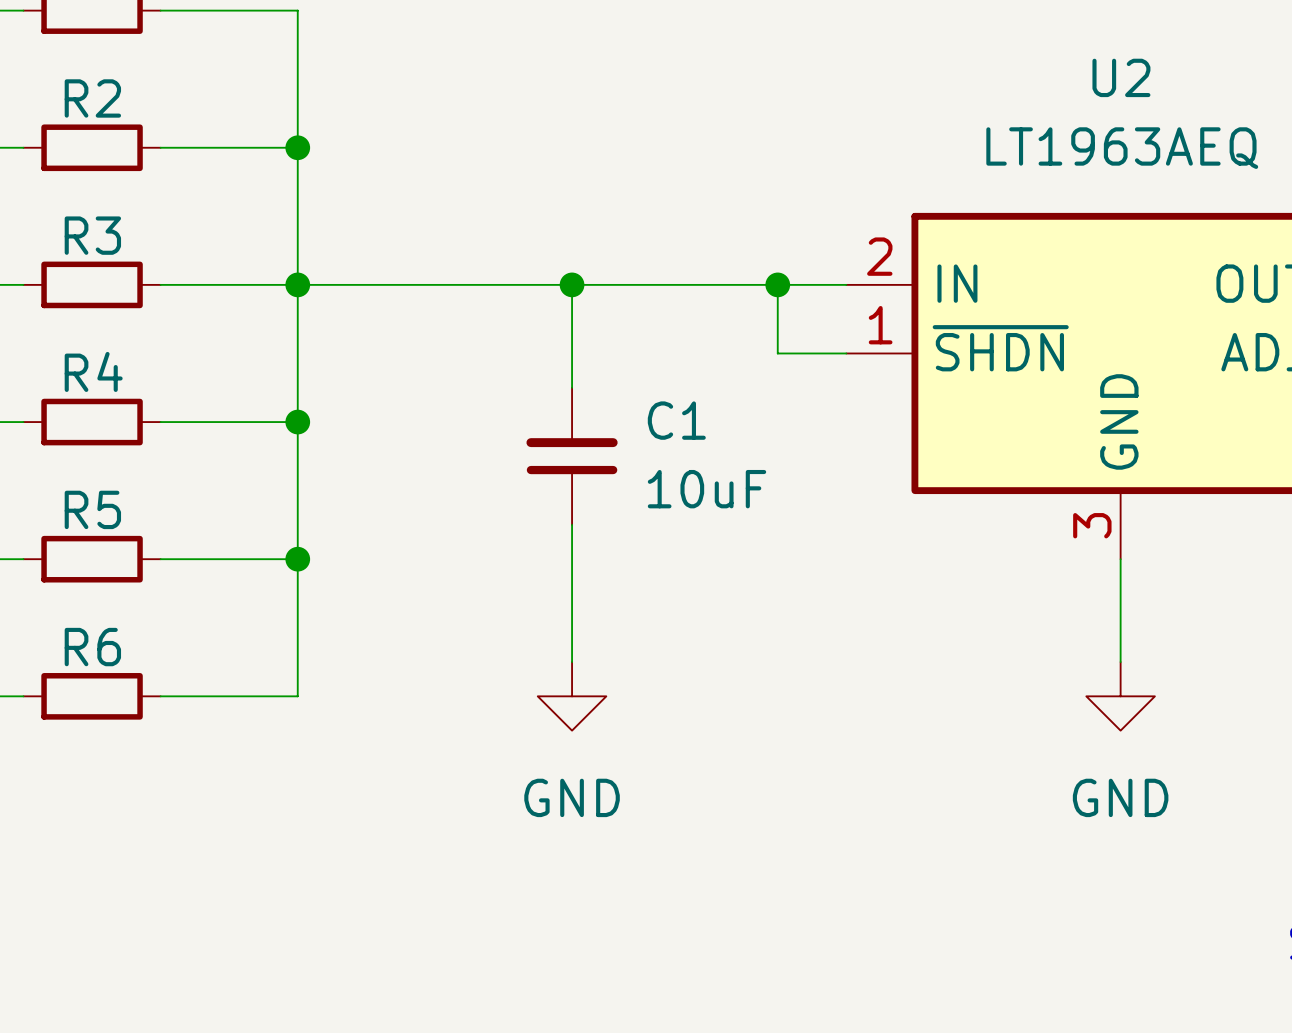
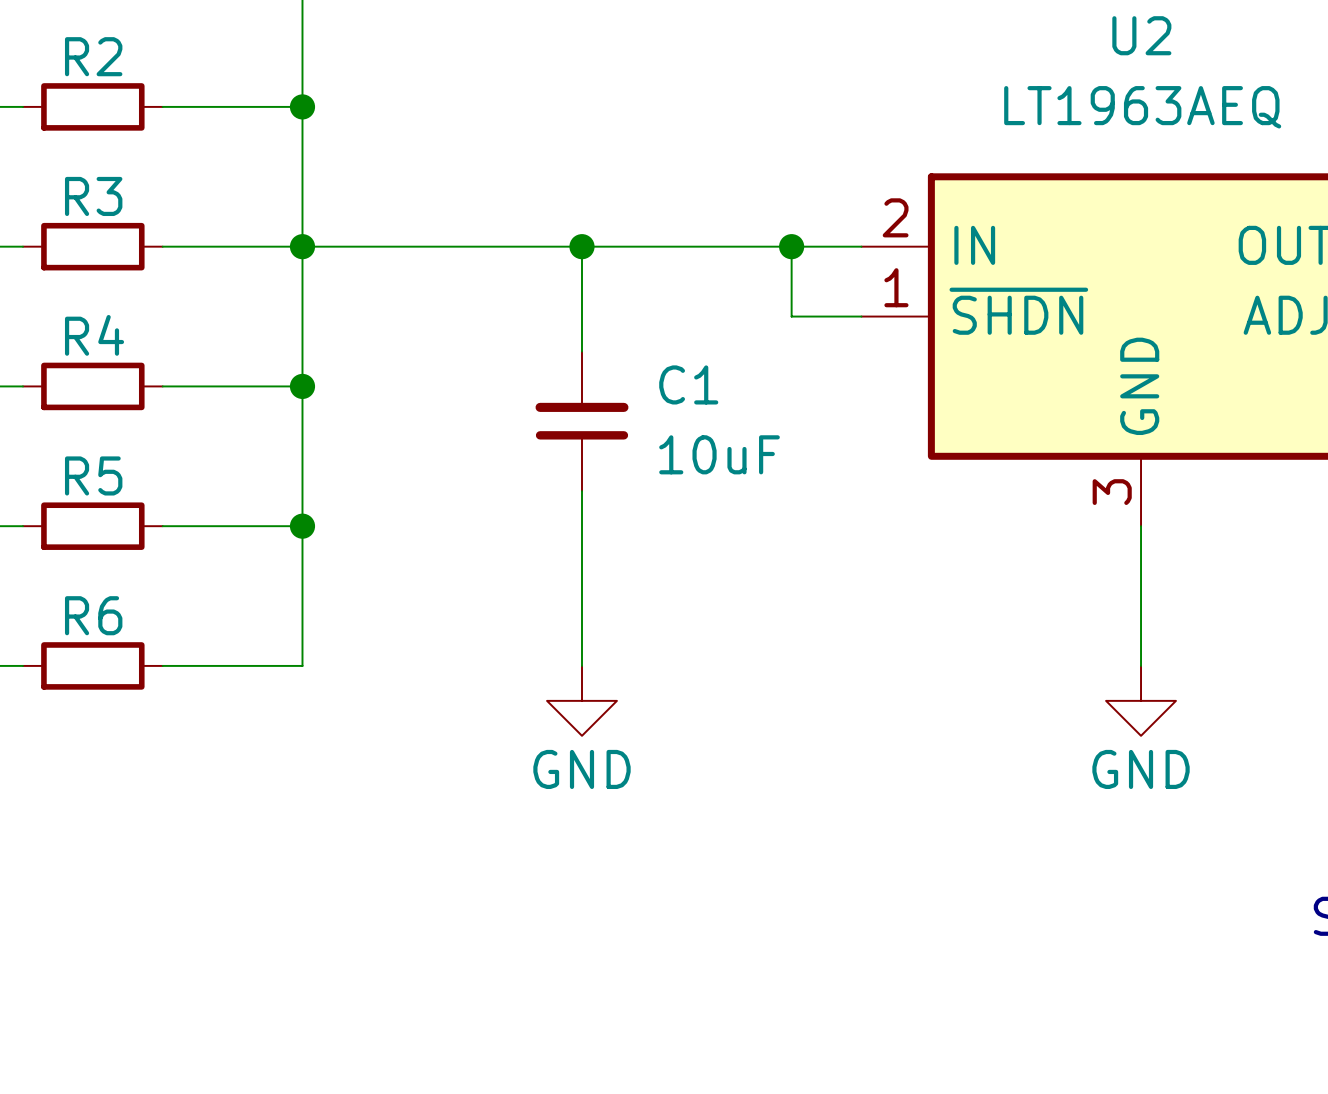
power symbol position: GND (572, 696) -> GND (581, 700)
power symbol position: GND (1120, 696) -> GND (1141, 700)

